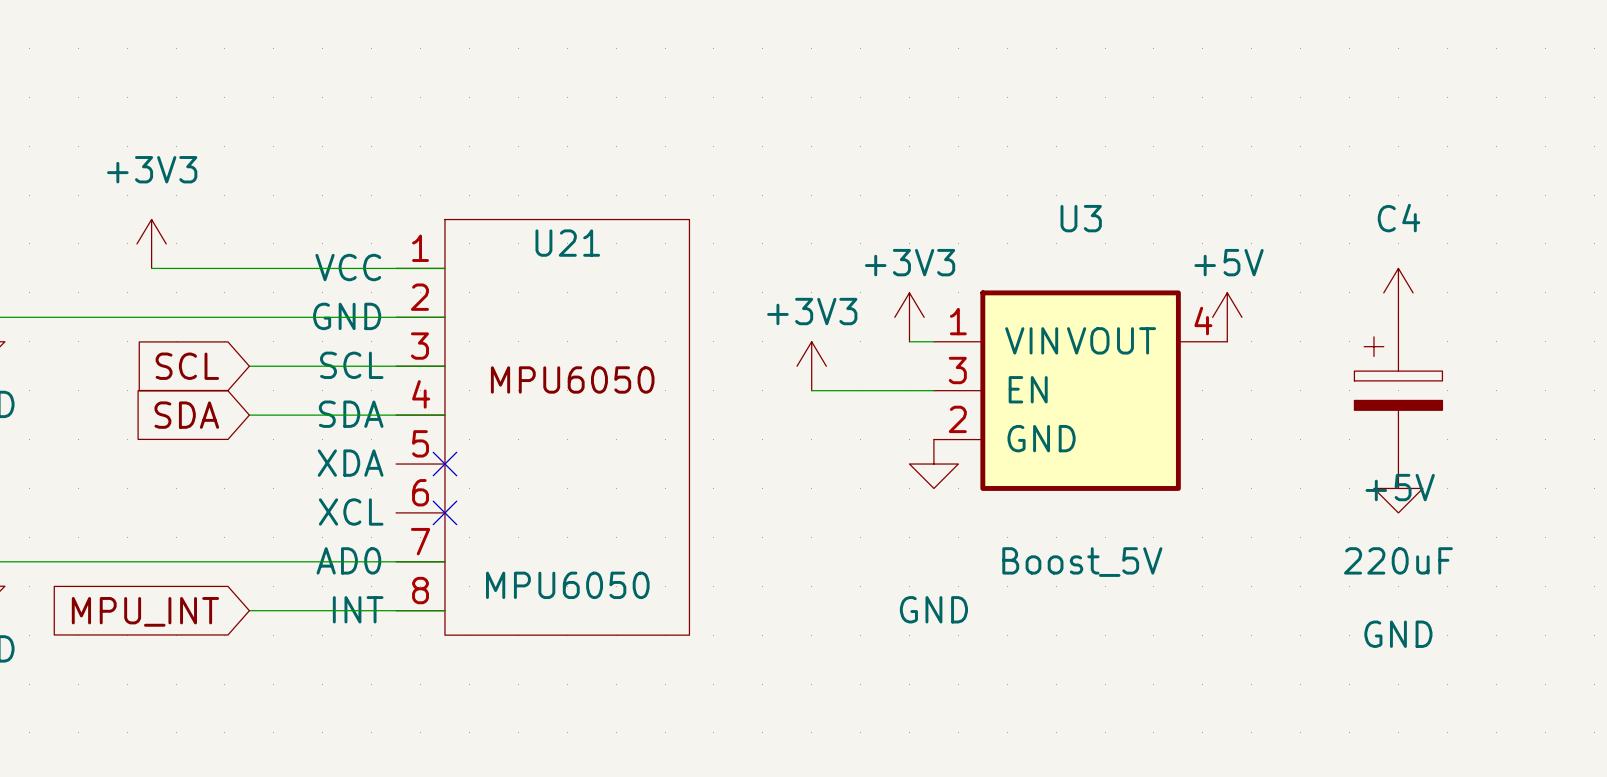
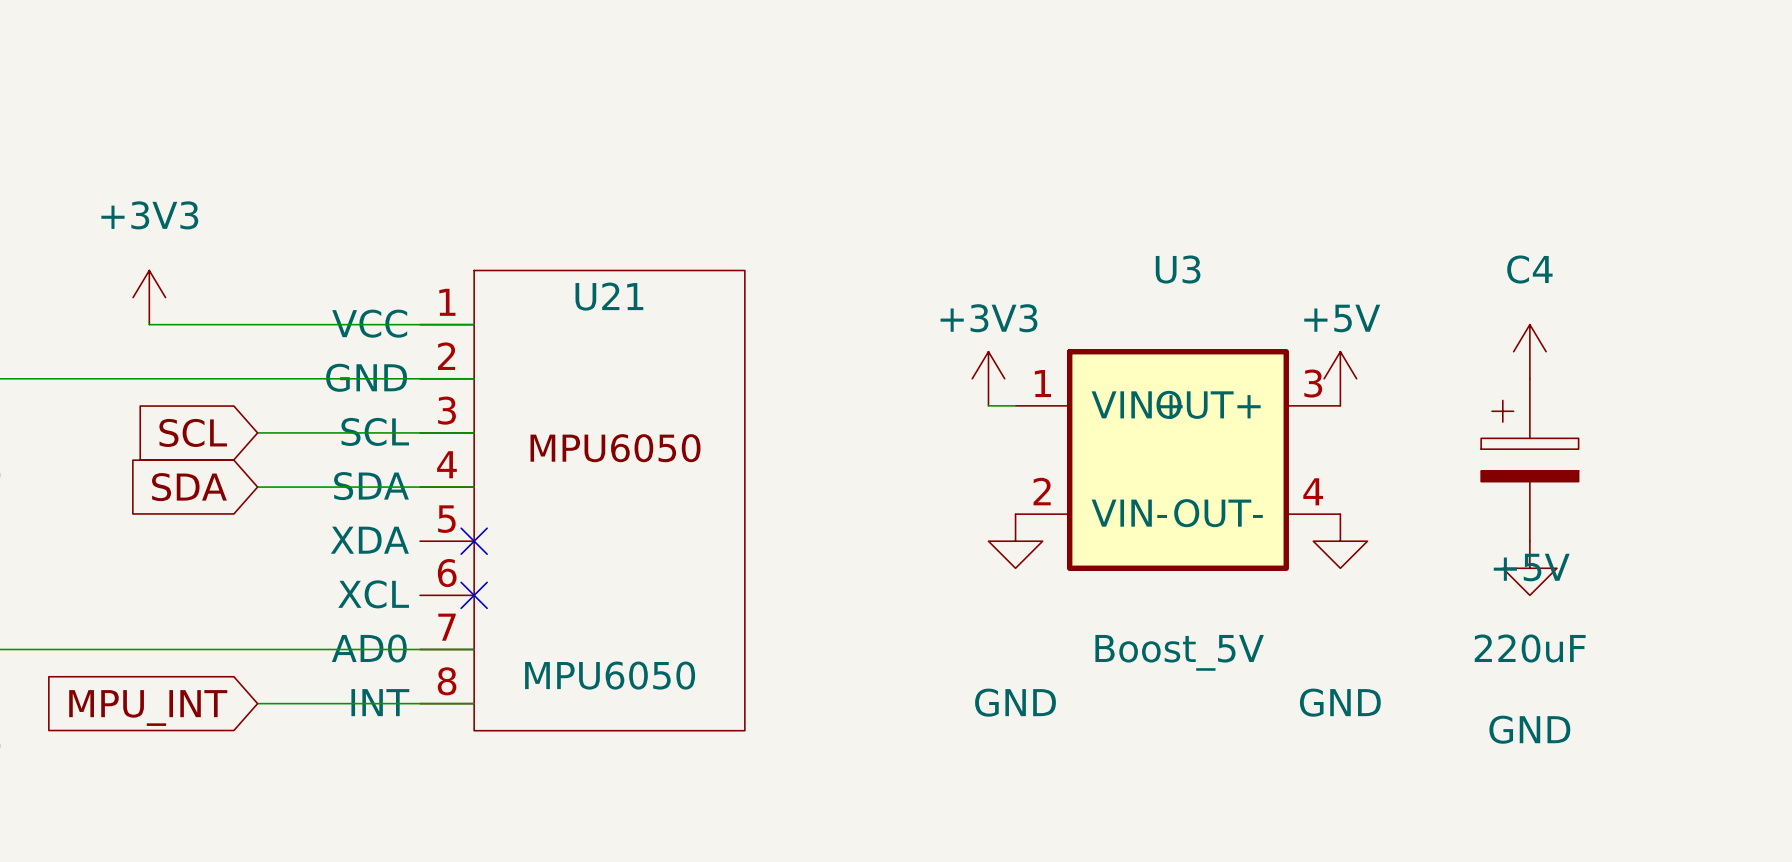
U3 symbol: [933, 290, 1228, 491] -> [1015, 349, 1341, 571]
power symbol: +3V3 (811, 366) -> none
wire: (811, 390) (933, 390) -> none
power symbol: none -> GND (1340, 541)

